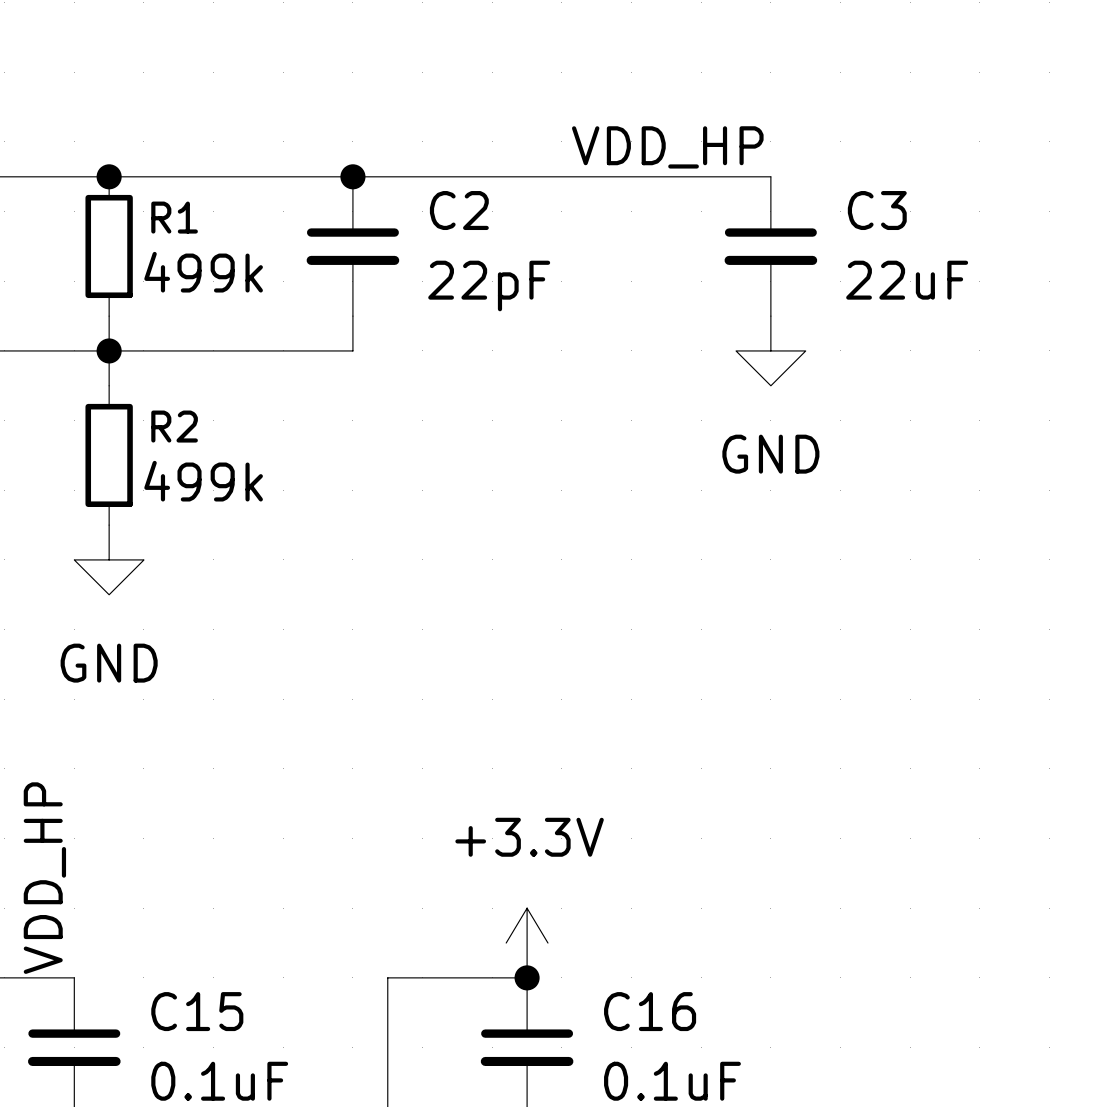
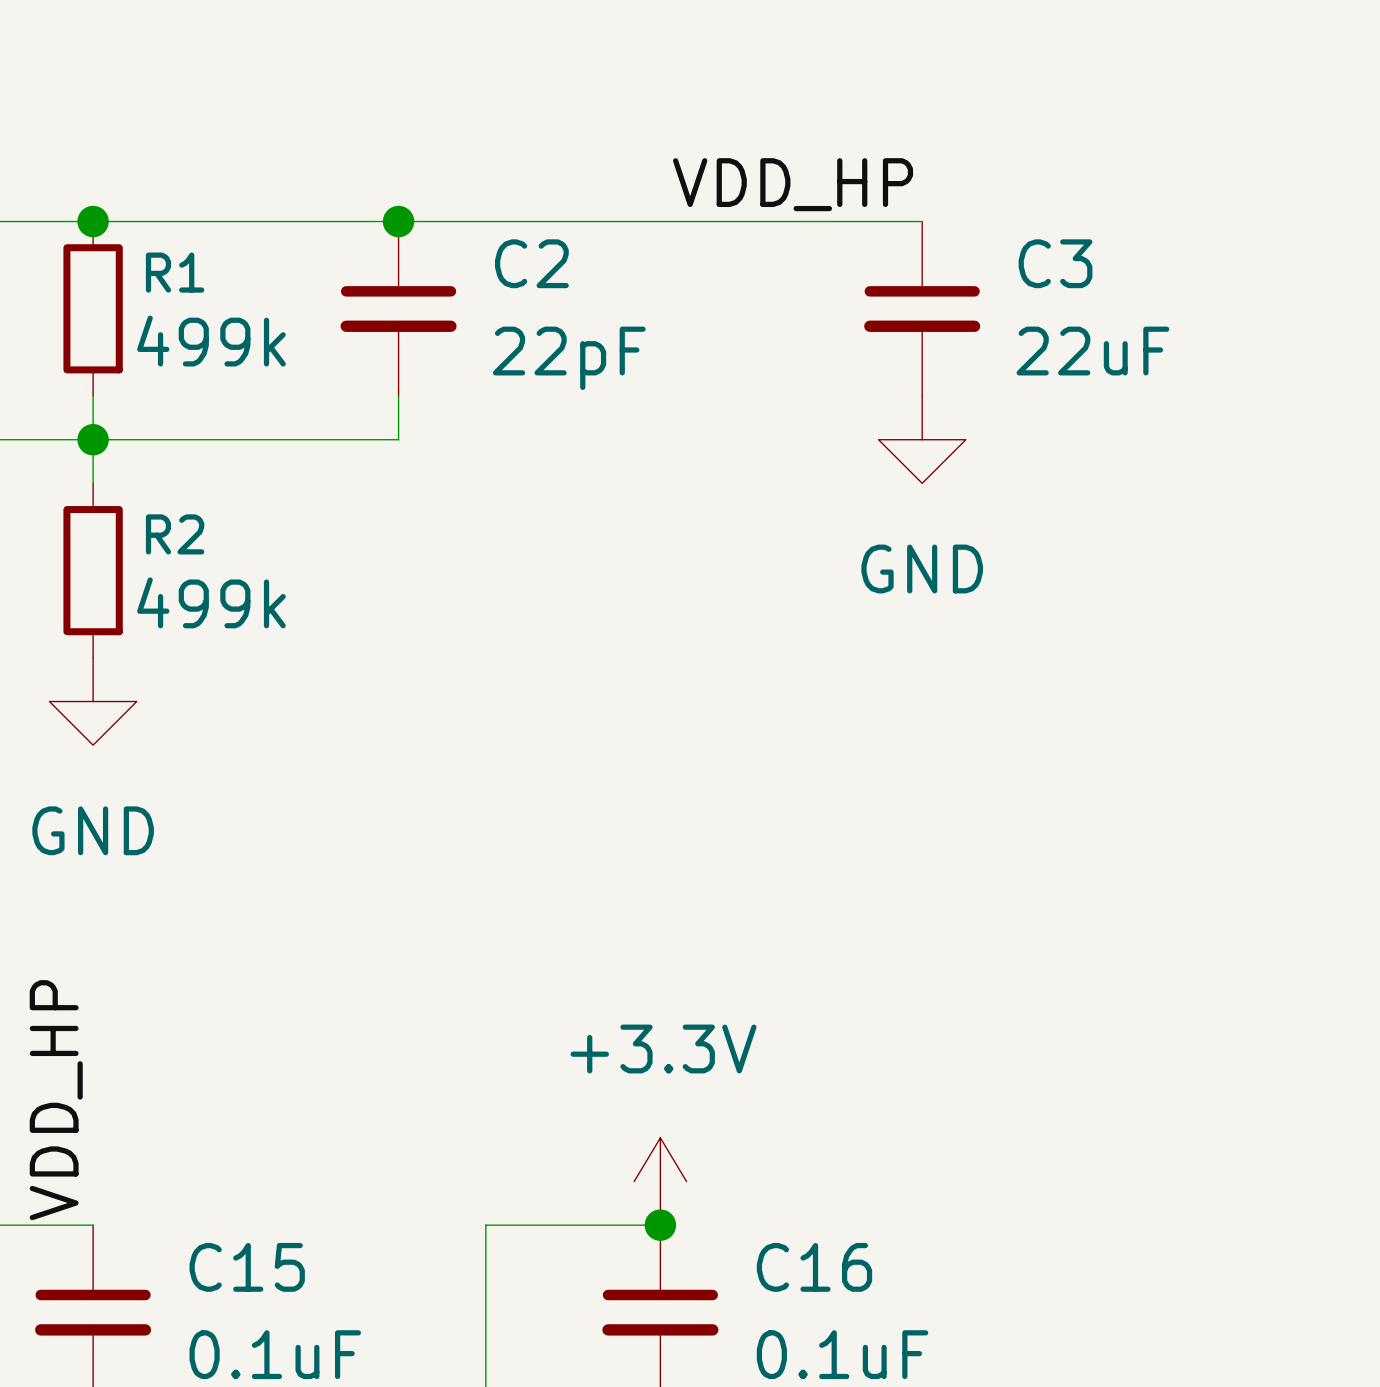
label position: VDD_HP (667, 147) -> VDD_HP (793, 184)
junction position: (109, 176) -> (93, 221)
junction position: (352, 176) -> (398, 221)
wire: (736, 176) (770, 176) -> none
R1 position: (109, 246) -> (93, 308)
C2 position: (352, 246) -> (398, 308)
C3 position: (770, 246) -> (922, 308)
wire: (109, 316) (109, 385) -> (93, 396) (93, 483)
wire: (352, 316) (352, 350) (318, 350) -> (398, 396) (398, 439)
junction position: (109, 350) -> (93, 439)
power symbol position: GND (770, 350) -> GND (922, 439)
R2 position: (109, 455) -> (93, 570)
power symbol position: GND (109, 559) -> GND (93, 701)

